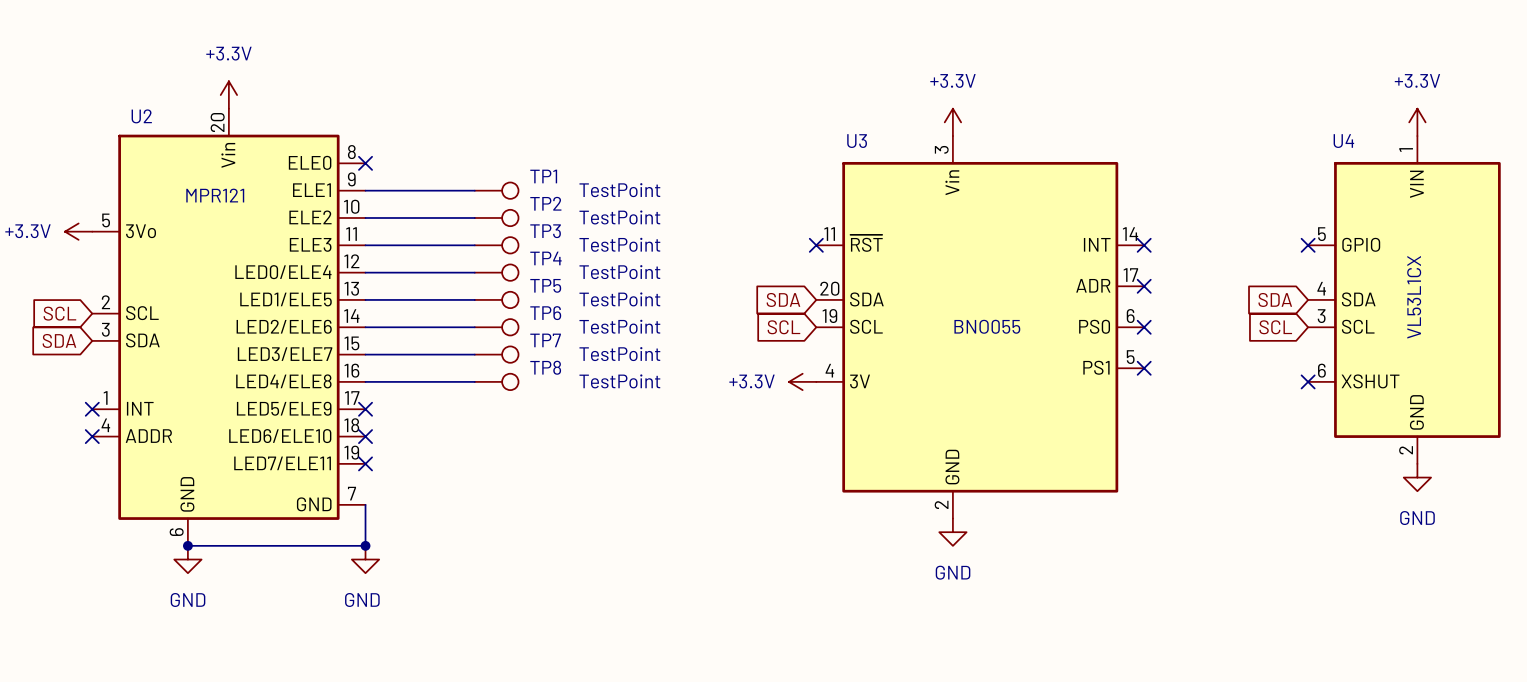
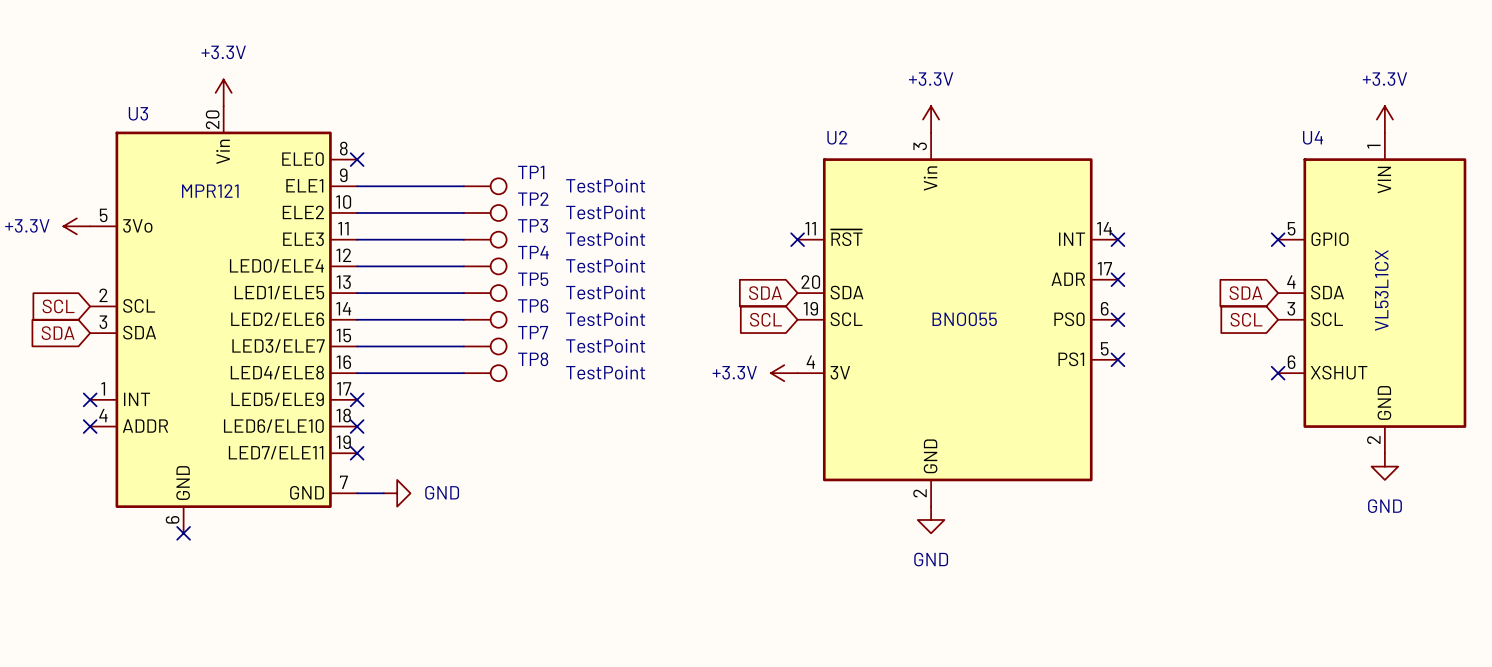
U2 name: U2 (141, 116) -> U3 (138, 113)
U3 name: U3 (857, 141) -> U2 (837, 137)
wire: (365, 504) (365, 545) (187, 545) -> (357, 493) (383, 493)
junction: (187, 545) -> none
no-connect mark: none -> (183, 533)
junction: (365, 545) -> none
power symbol: GND (187, 559) -> none
power symbol rotation: 0° (365, 559) -> 90° counterclockwise (397, 493)
power symbol position: GND (365, 559) -> GND (397, 493)

